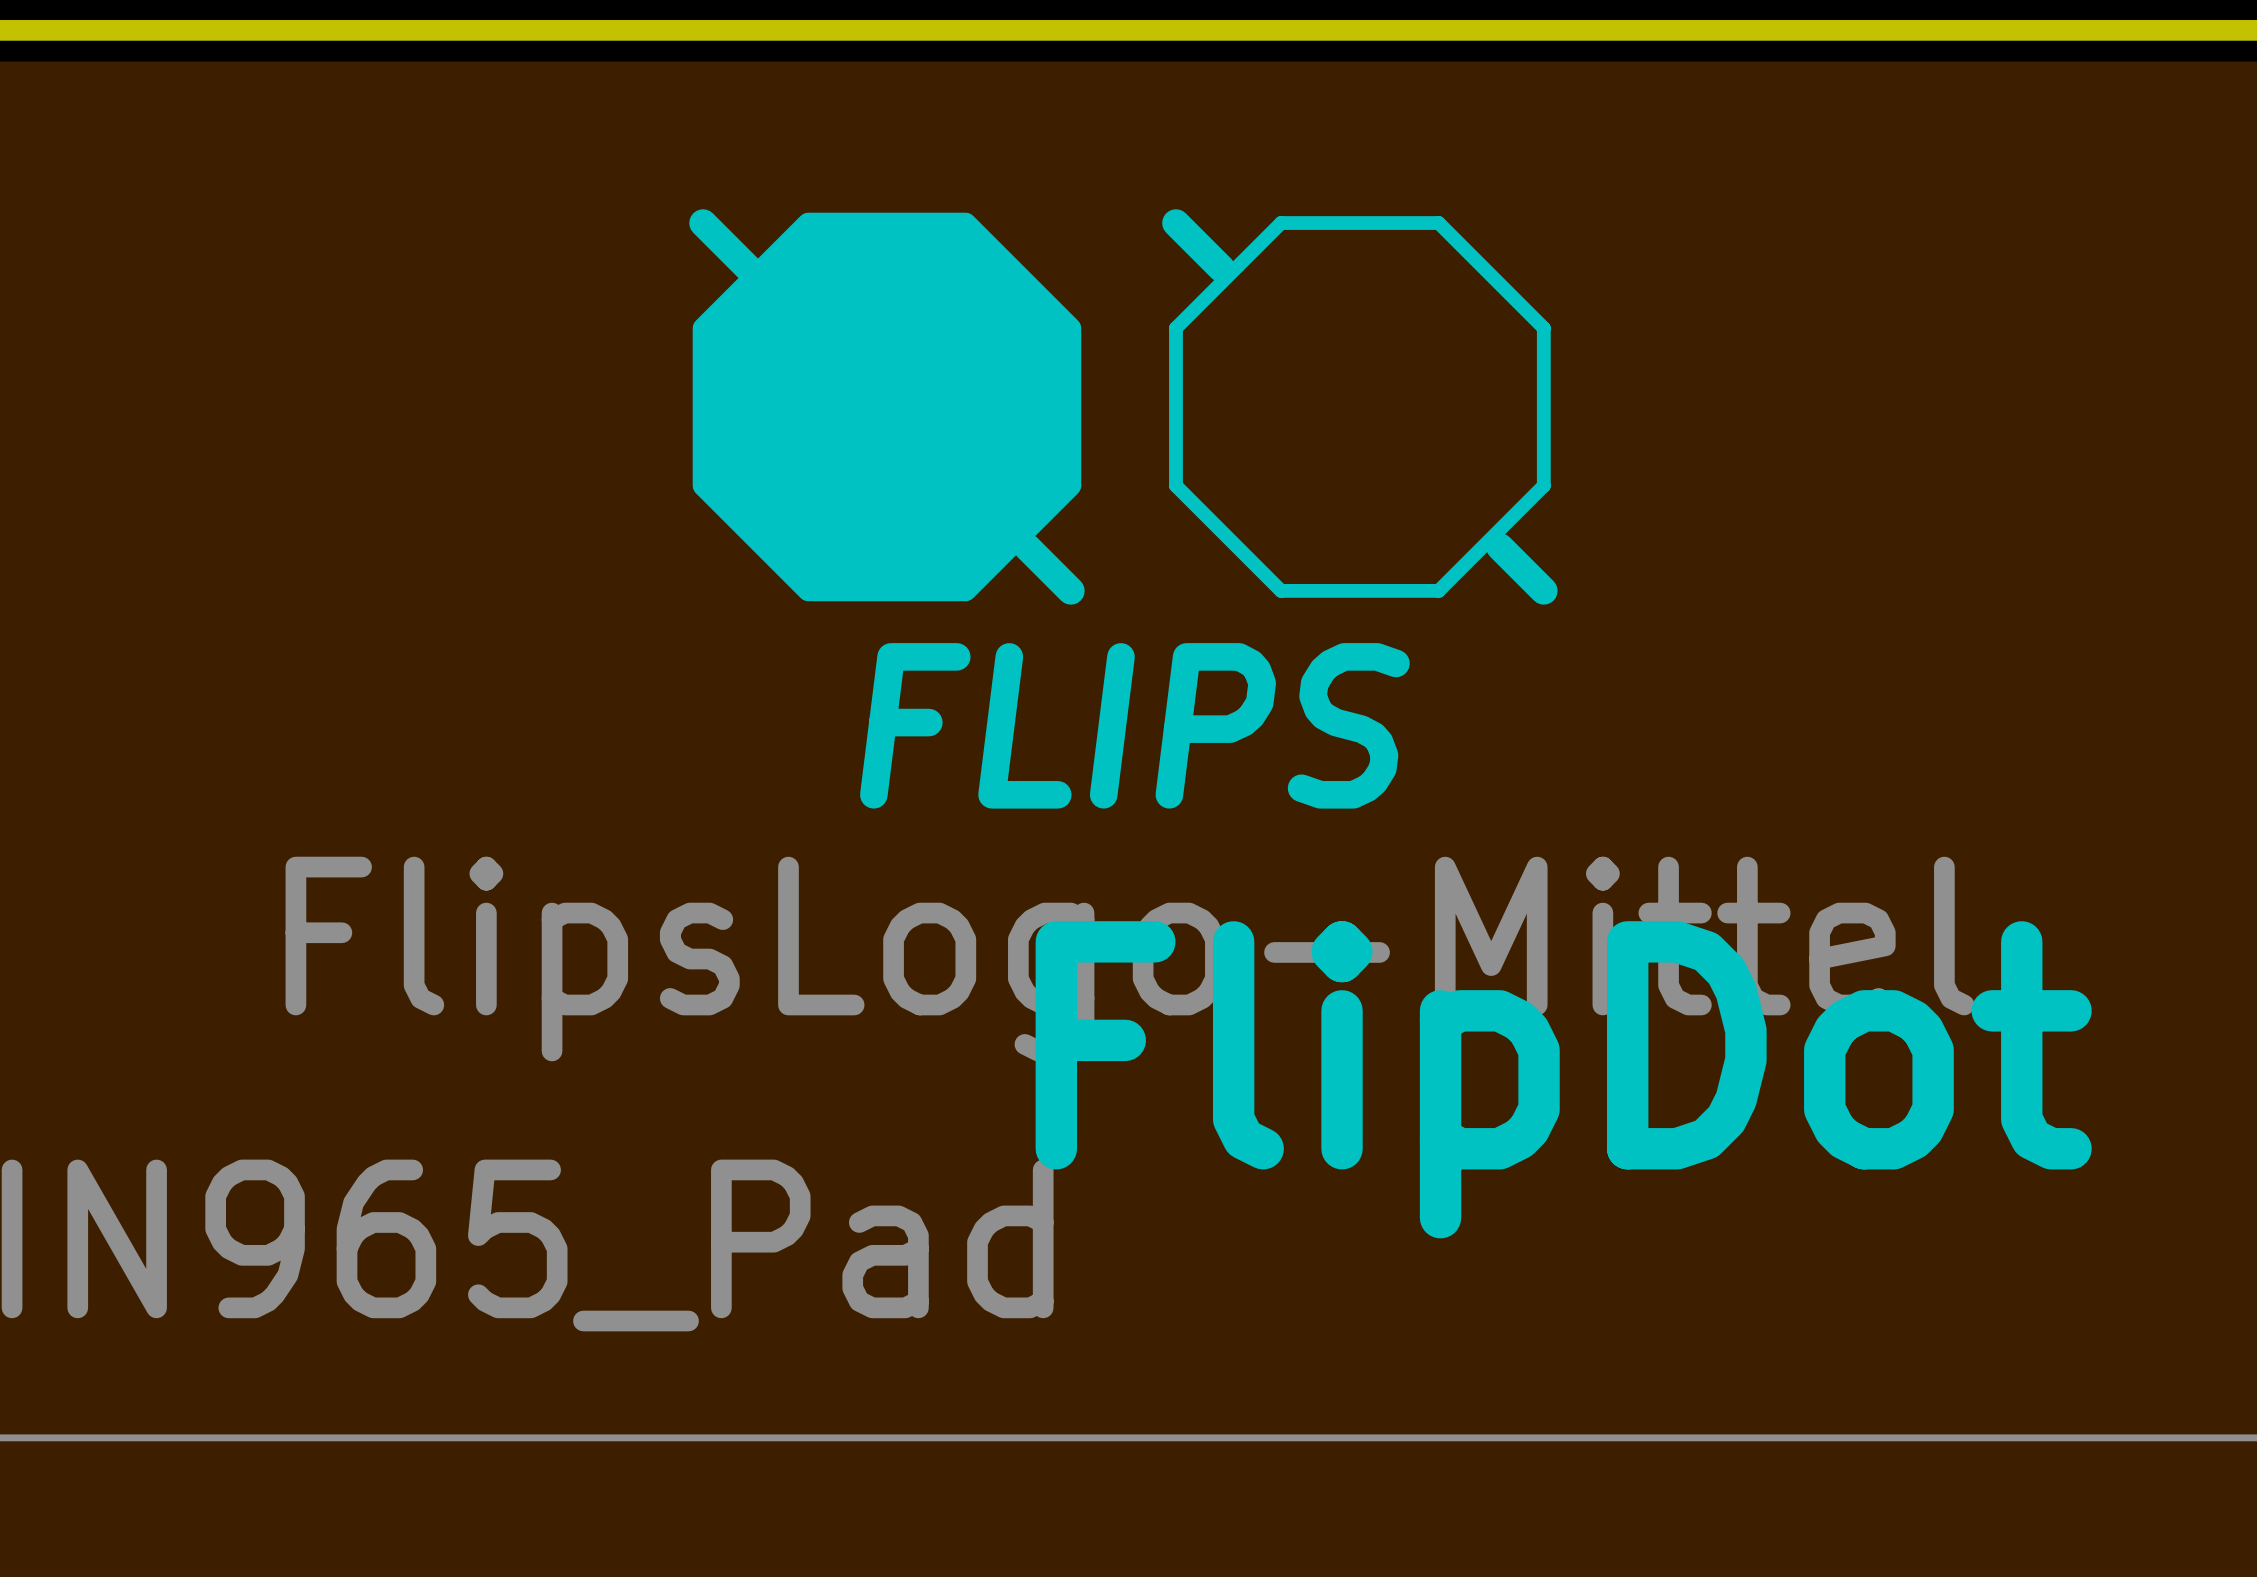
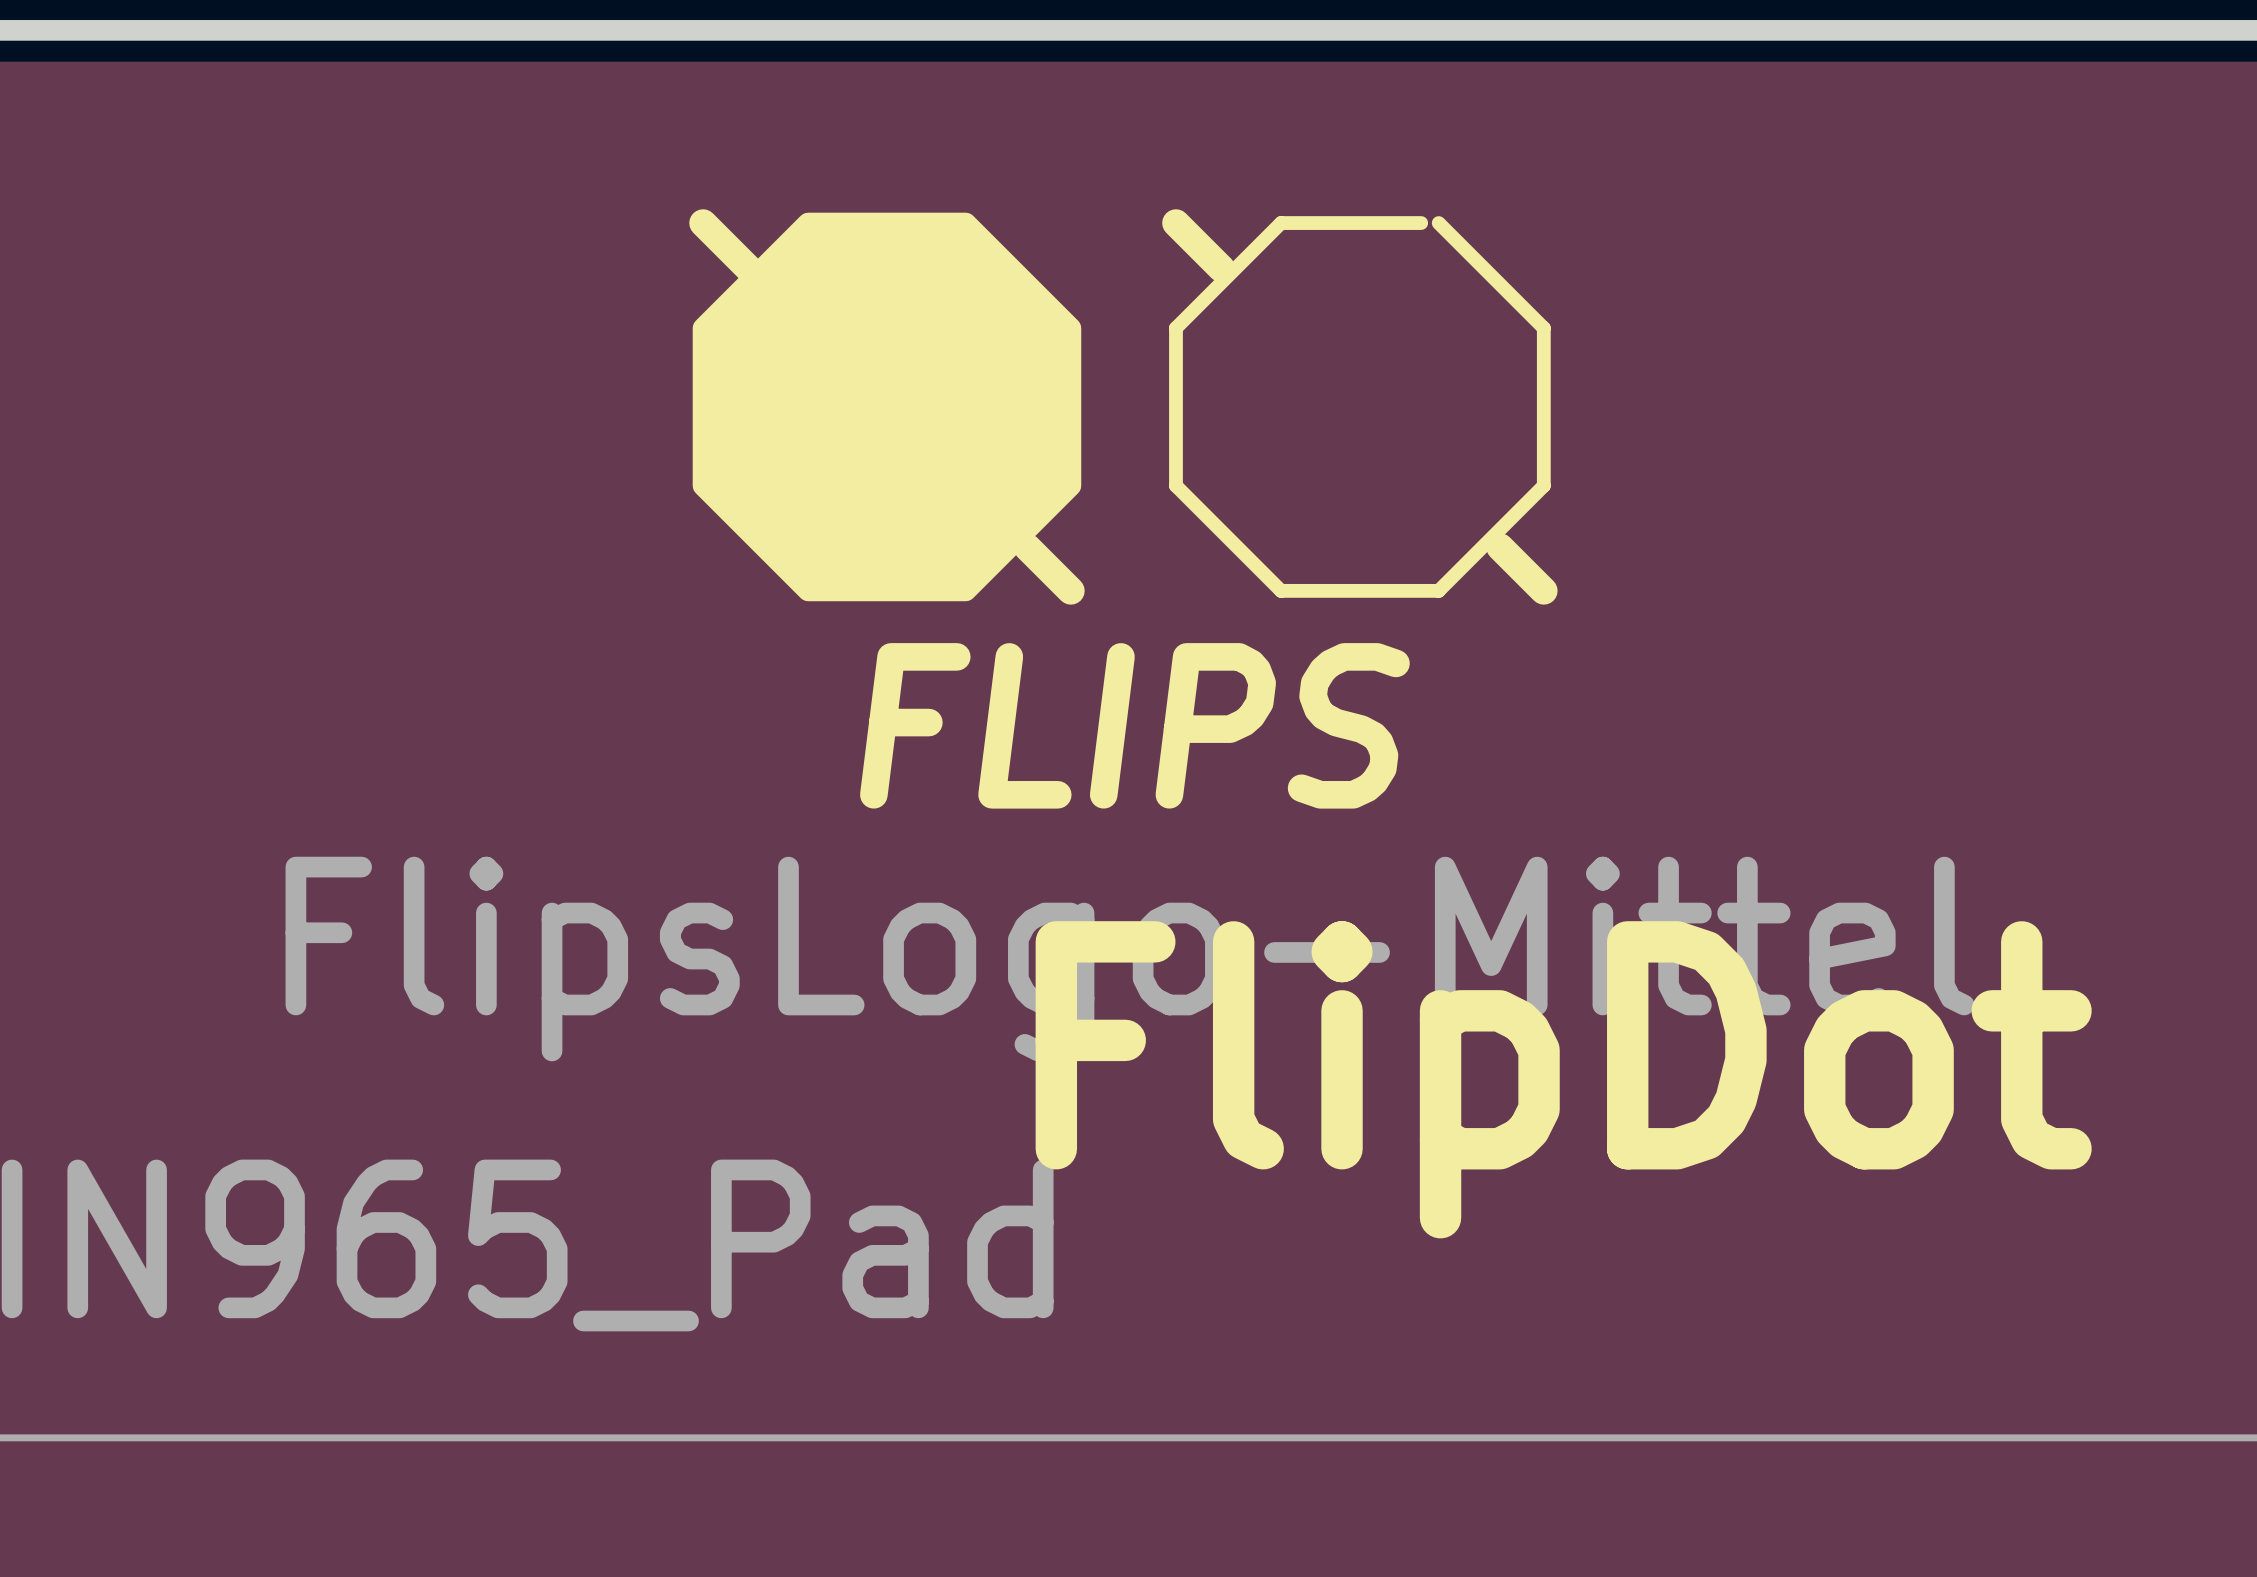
drawing shape: [285, 209, 1975, 1062] -> [285, 209, 1975, 1062]

